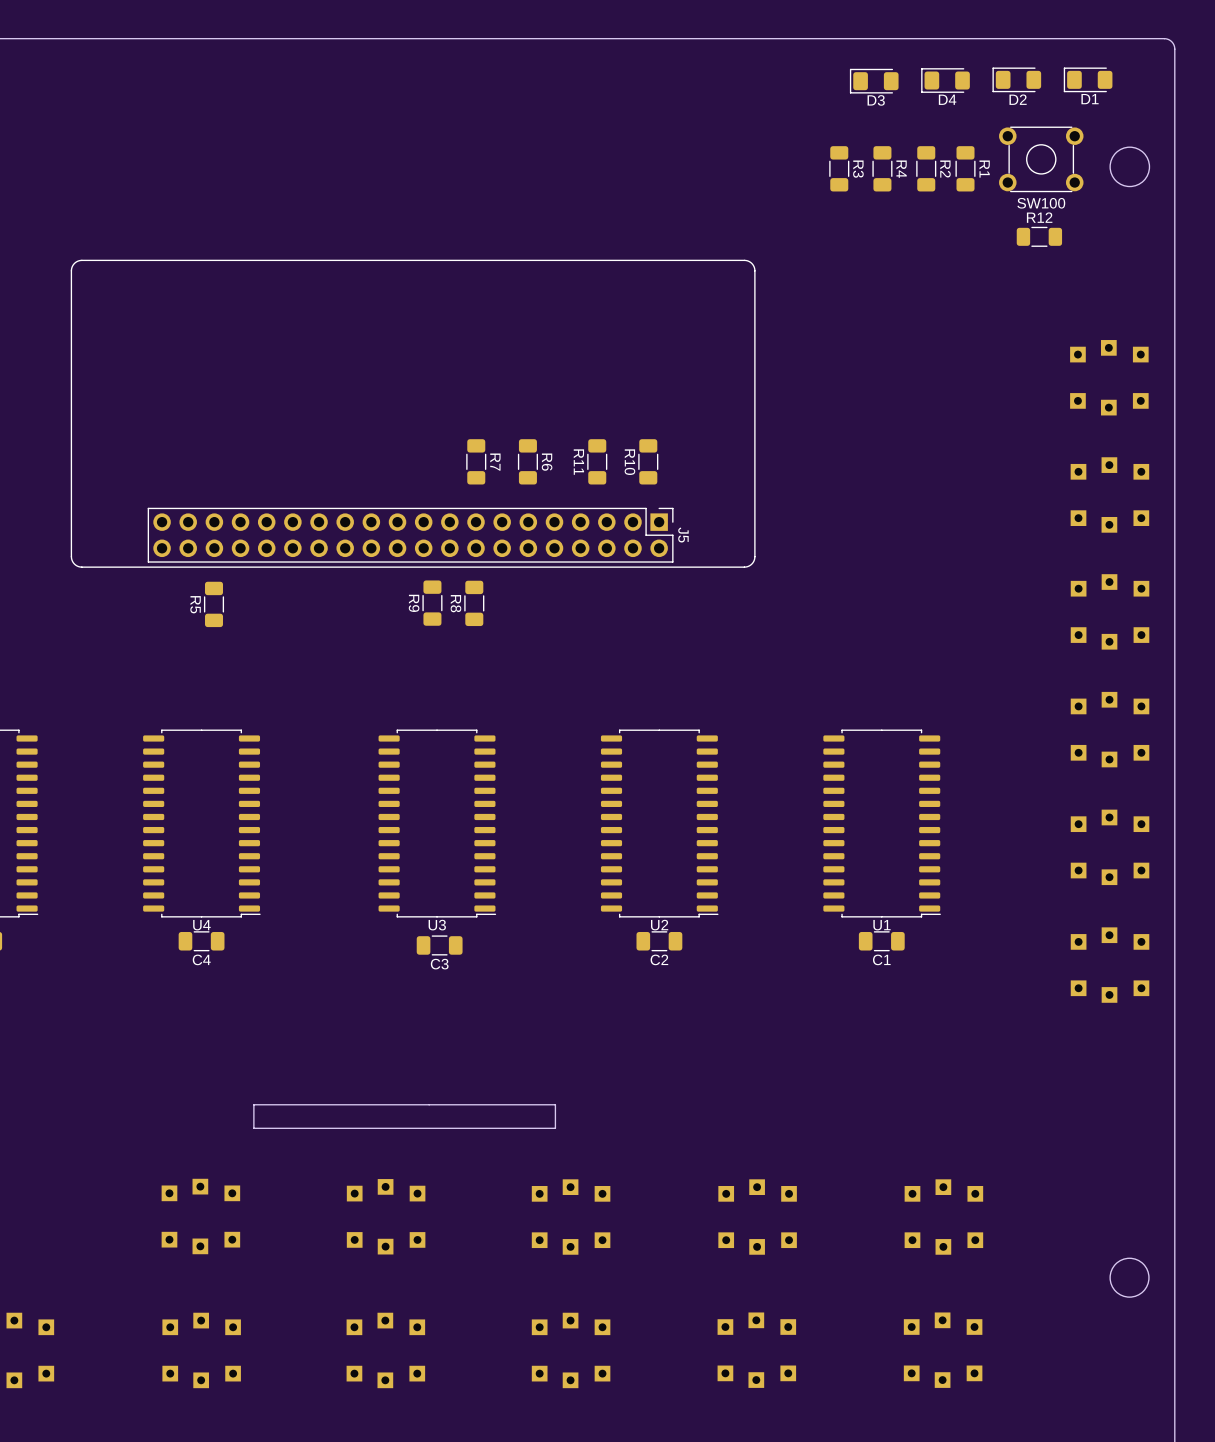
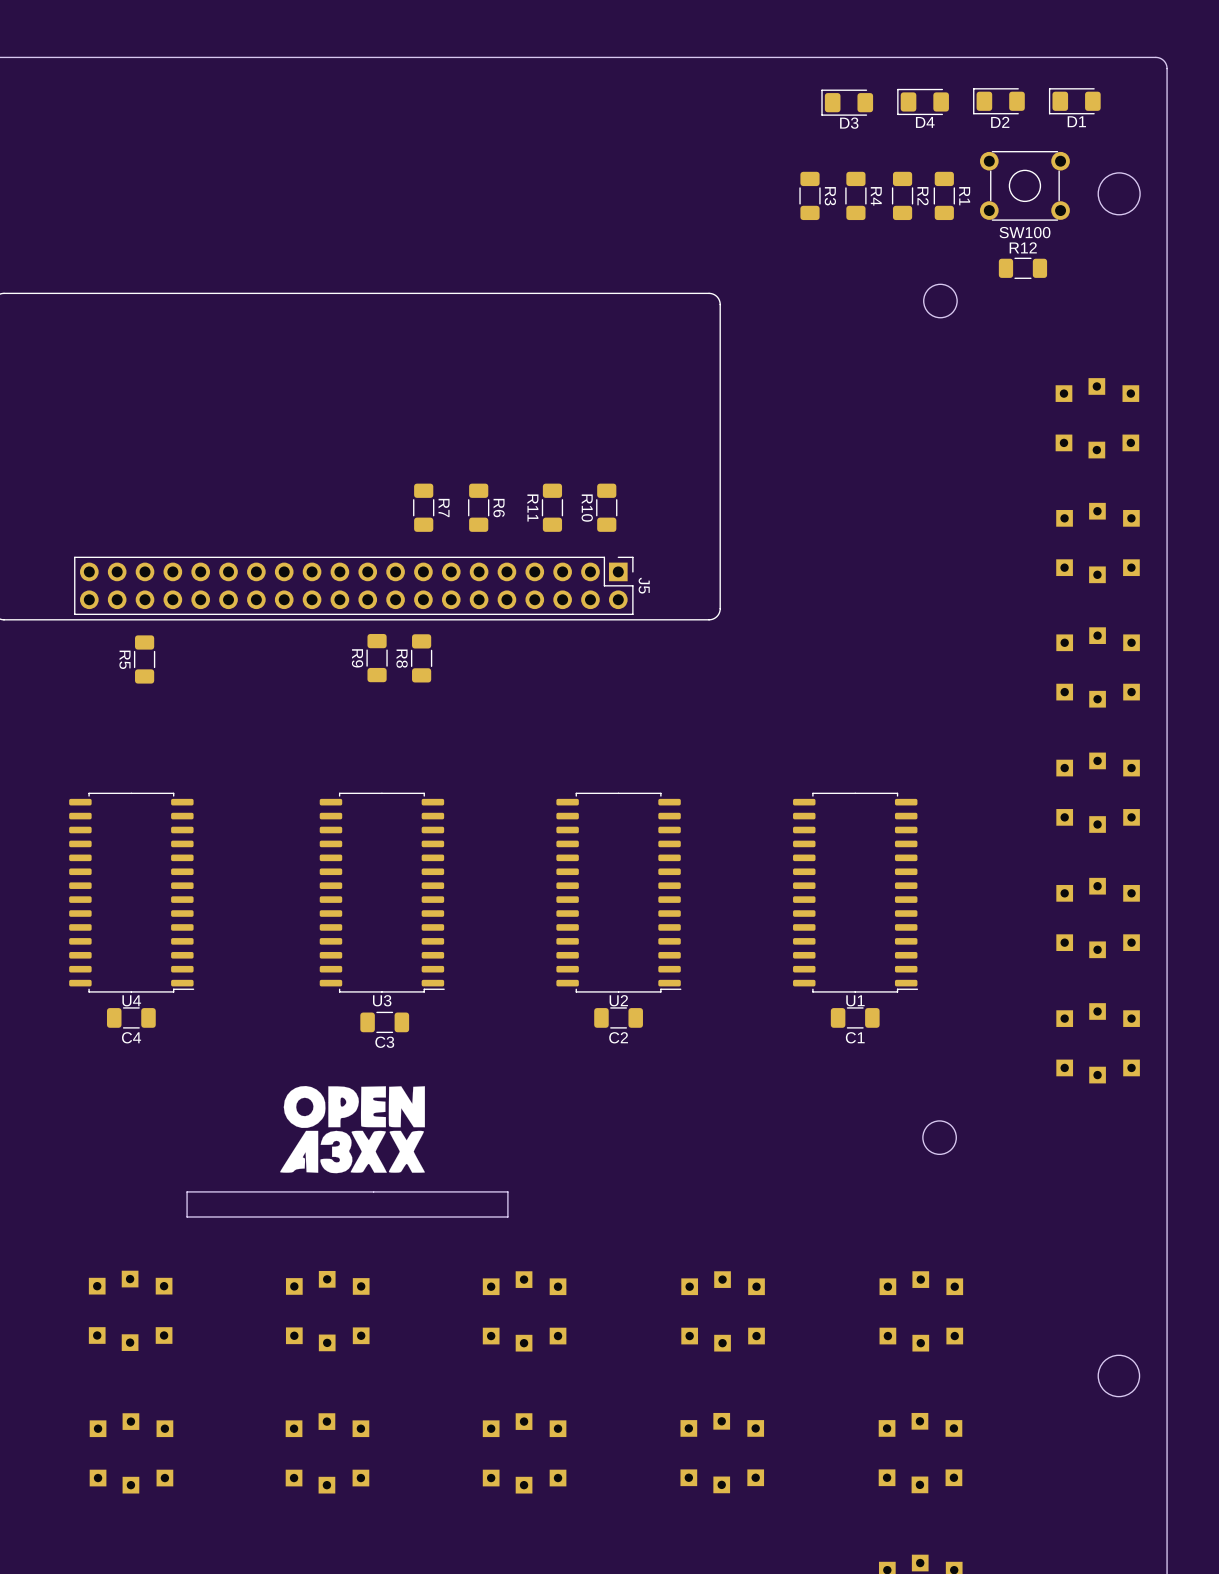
round board edge: none -> [923, 284, 958, 319]
drawing: none -> [280, 1086, 425, 1174]
round board edge: none -> [922, 1120, 957, 1155]

